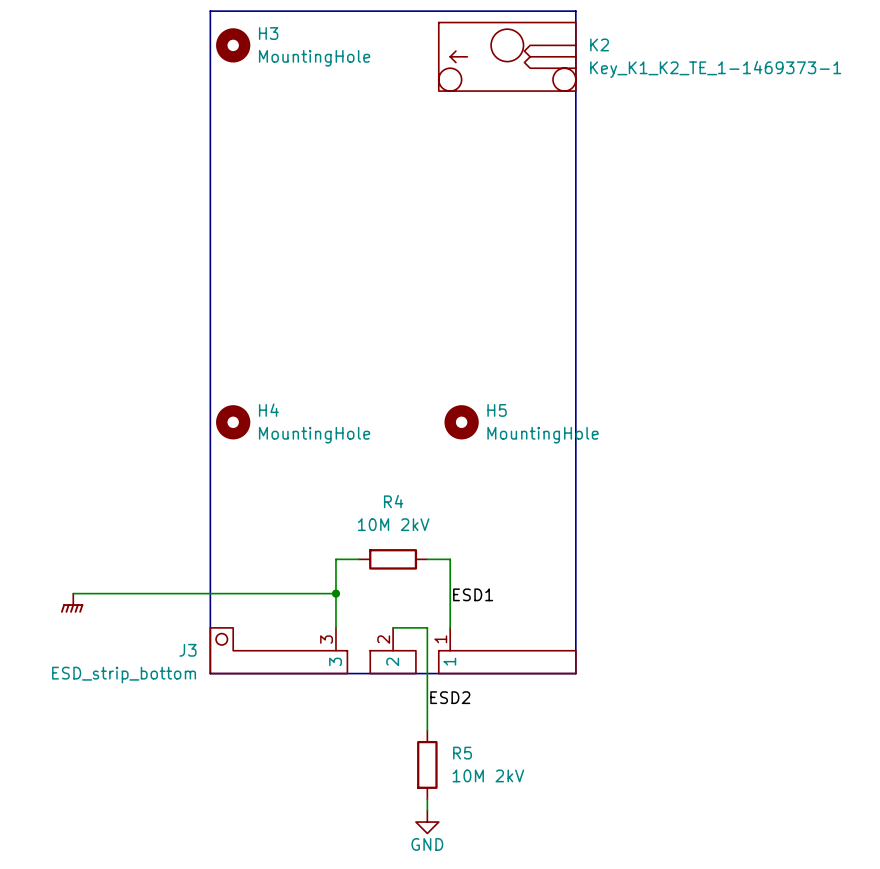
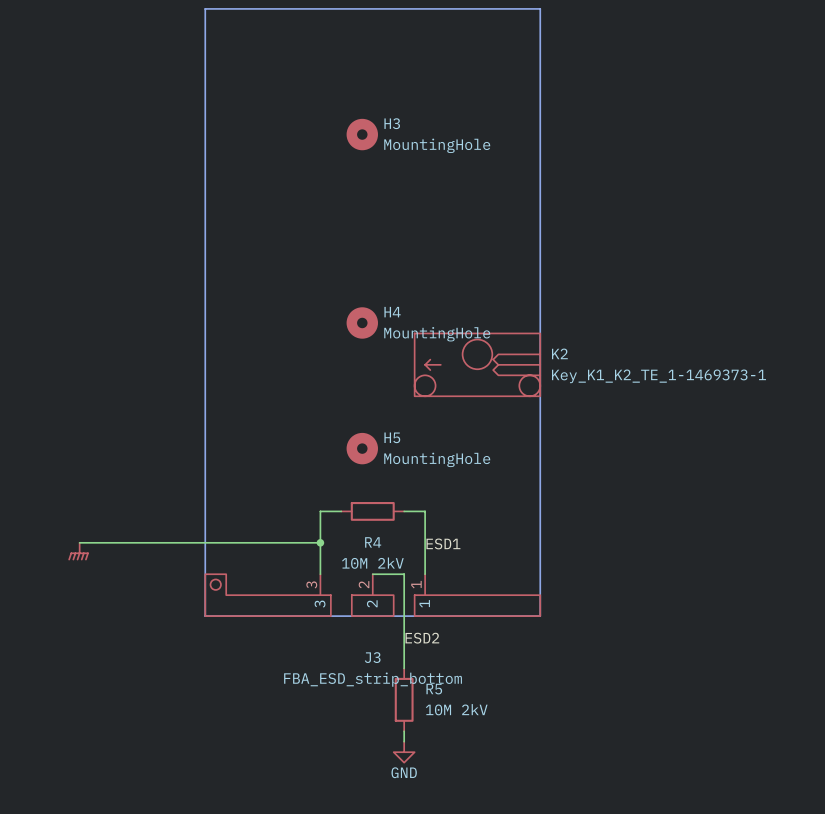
H3 position: (233, 45) -> (362, 134)
K2 position: (507, 56) -> (477, 364)
H4 position: (233, 422) -> (362, 322)
H5 position: (461, 422) -> (362, 448)
R4 name position: R4 (393, 501) -> R4 (373, 542)
R4 value position: 10M 2kV (393, 524) -> 10M 2kV (372, 563)
J3 name position: J3 (187, 650) -> J3 (372, 657)
J3 value: ESD_strip_bottom (124, 675) -> FBA_ESD_strip_bottom (373, 679)

